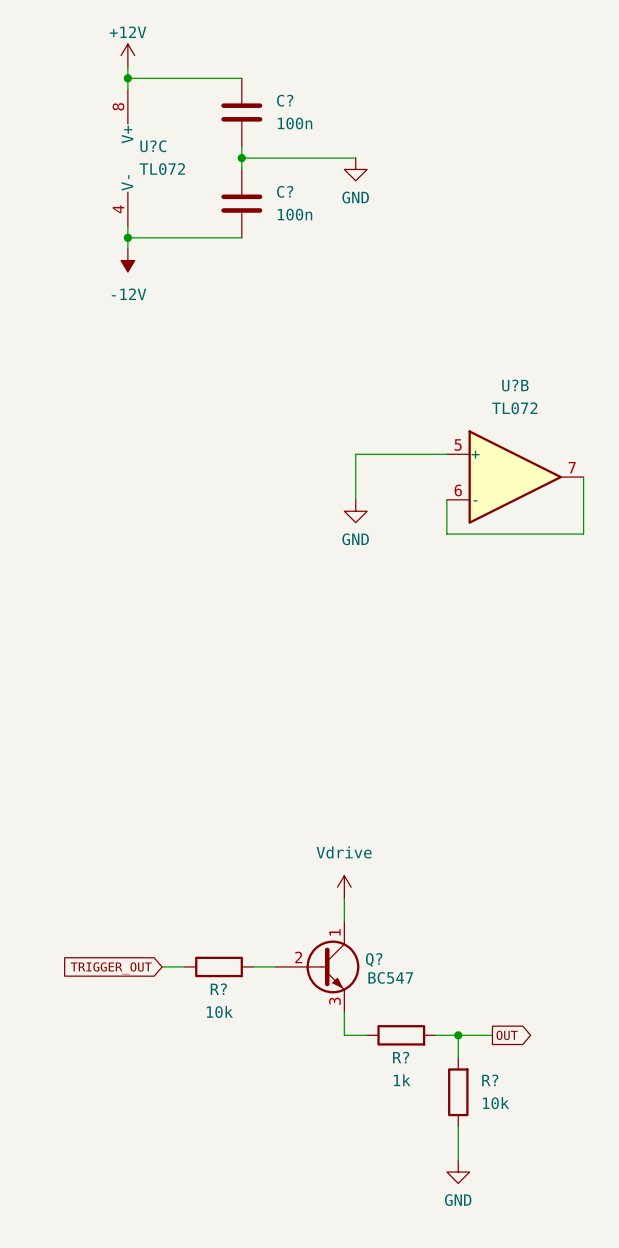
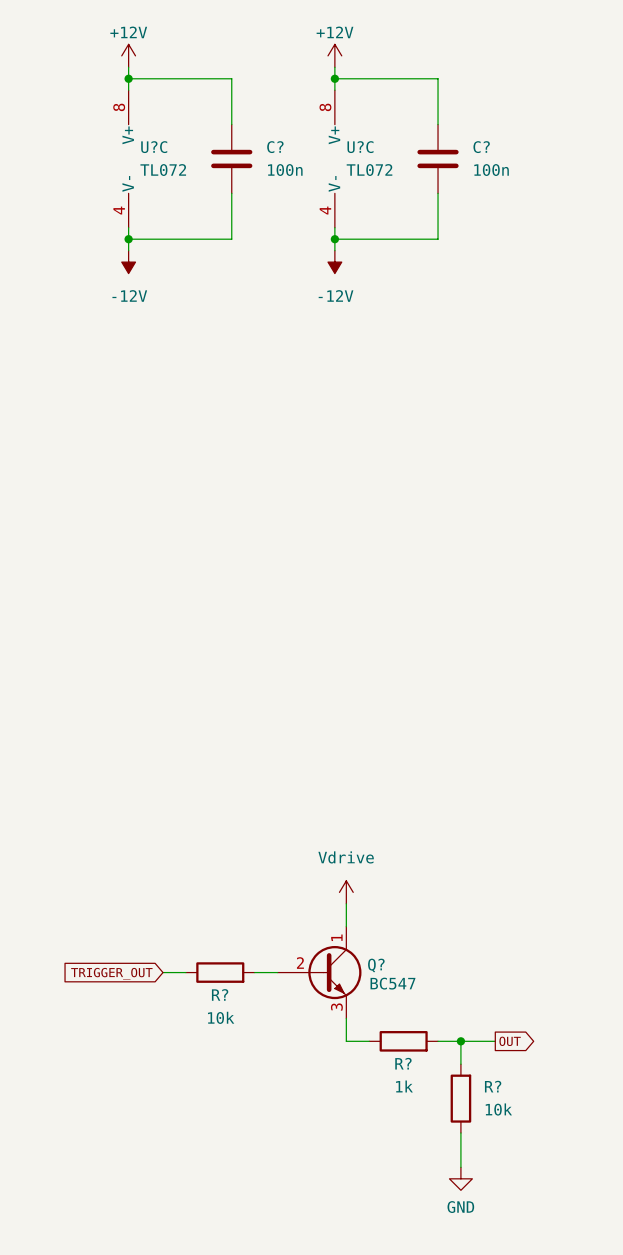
power symbol: none -> +12V (334, 55)
wire: (230, 78) (241, 78) -> (231, 78) (231, 124)
wire: none -> (334, 78) (438, 78) (438, 124)
junction: none -> (334, 78)
C?: 100n (241, 112) -> none
wire: (241, 146) (241, 169) -> (334, 67) (334, 90)
C?: none -> 100n (231, 158)
wire: (241, 158) (355, 158) -> none
junction: (241, 158) -> none
U?C: none -> TL072 (334, 158)
C?: none -> 100n (438, 158)
power symbol: GND (355, 169) -> none
wire: none -> (438, 193) (438, 239) (334, 239)
C?: 100n (241, 203) -> none
wire: none -> (334, 227) (334, 250)
wire: (230, 237) (241, 237) -> (231, 239) (231, 193)
junction: none -> (334, 239)
power symbol: none -> -12V (334, 262)
wire: (446, 454) (355, 454) (355, 499) -> none
U?B: TL072 (515, 477) -> none
wire: (583, 477) (583, 534) (446, 534) (446, 499) -> none
power symbol: GND (355, 511) -> none

